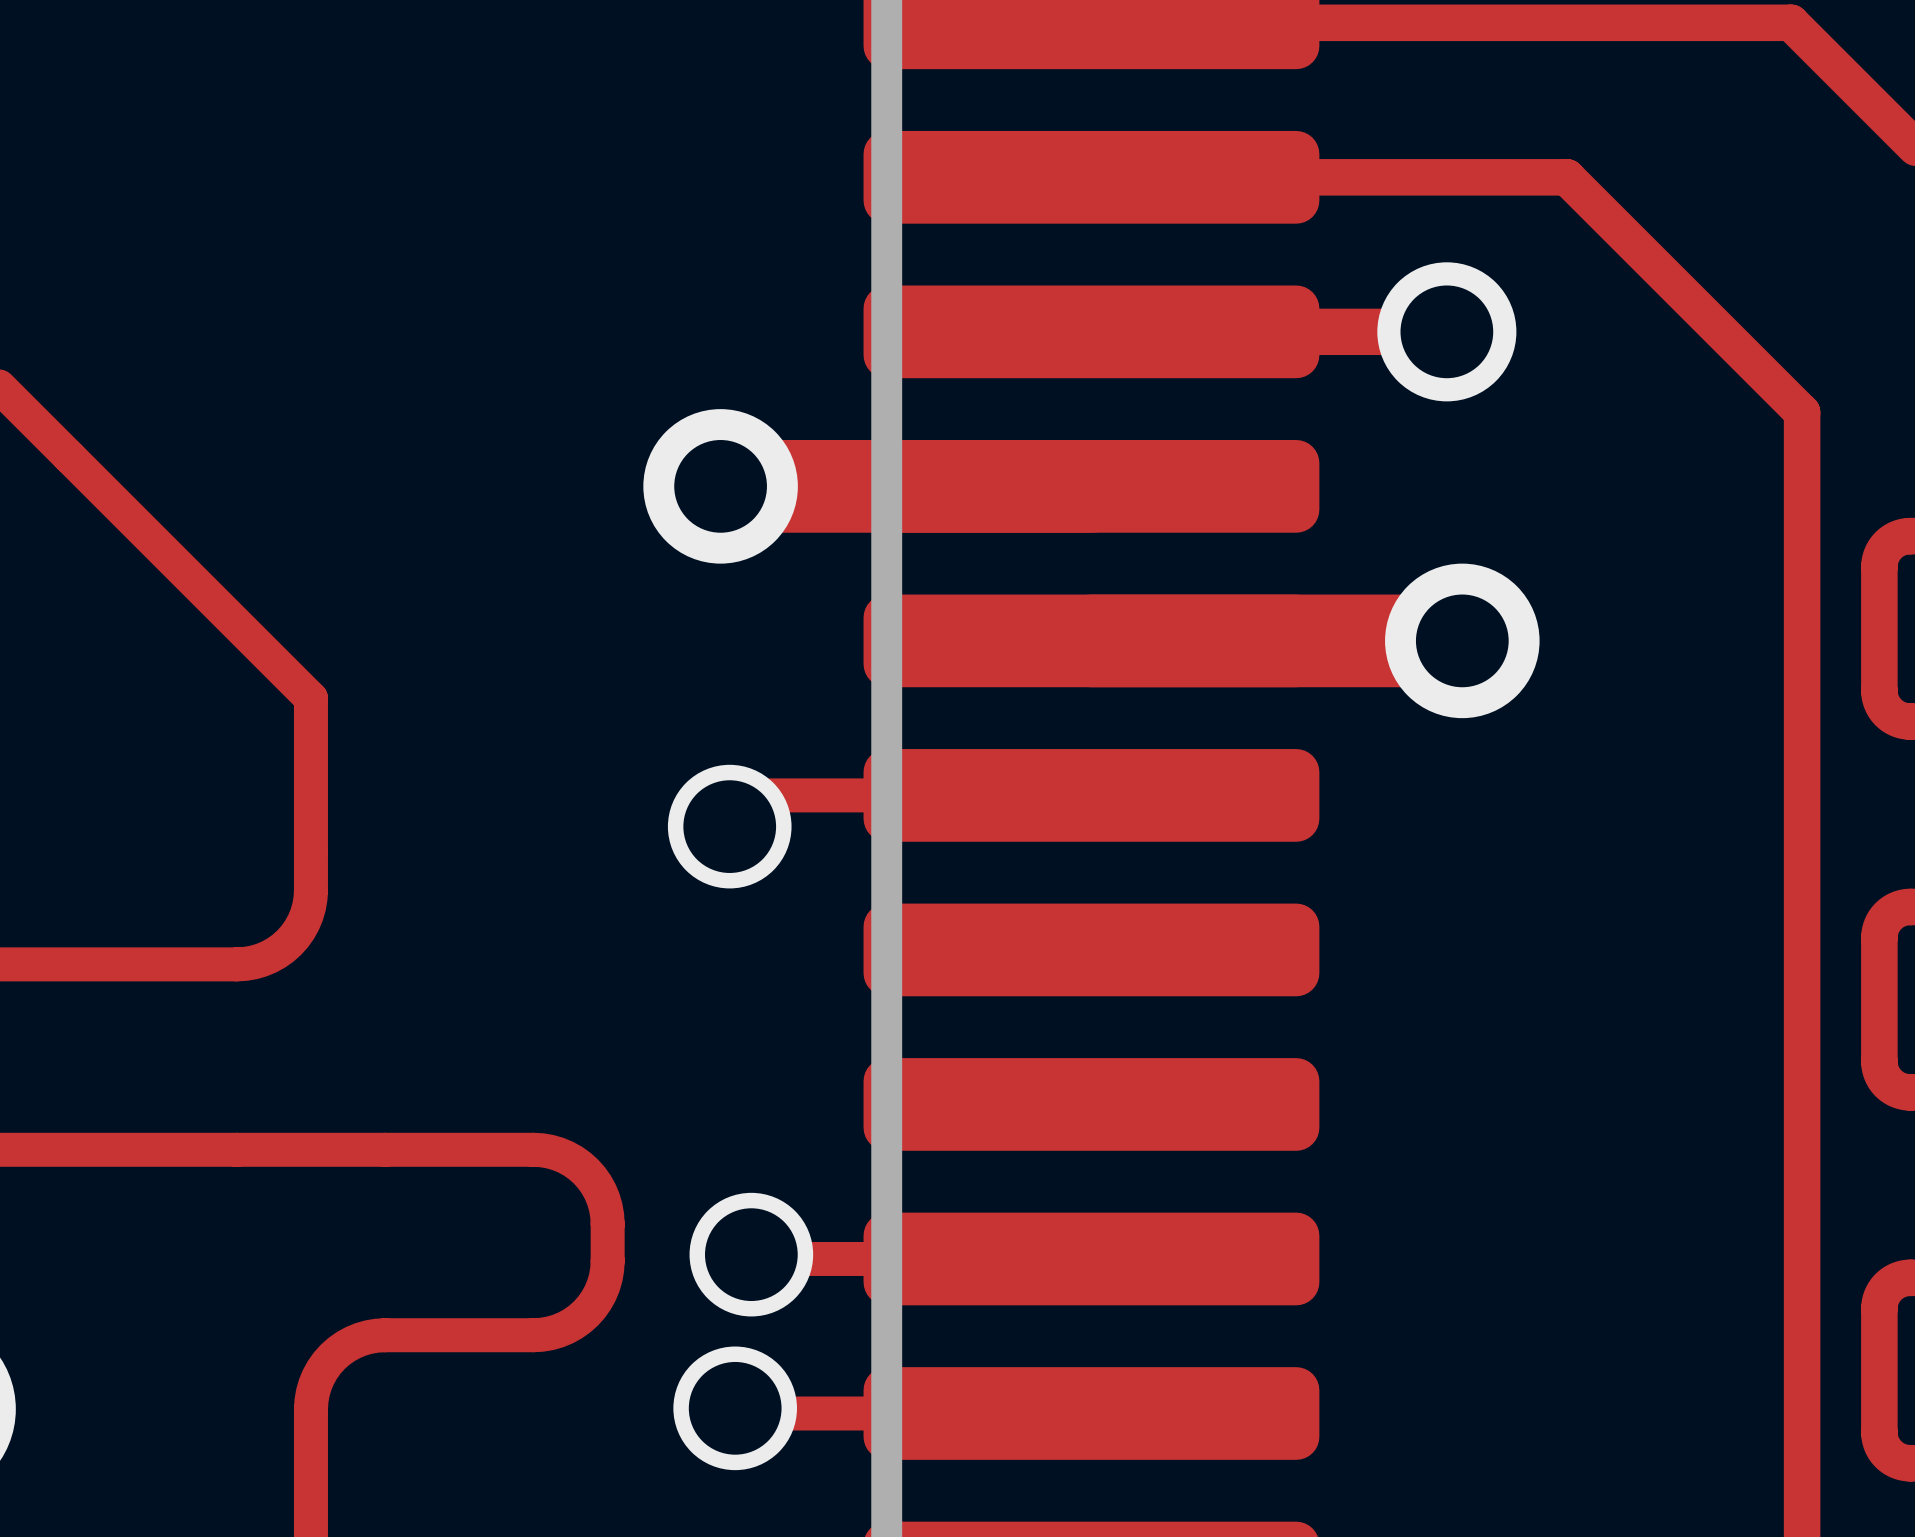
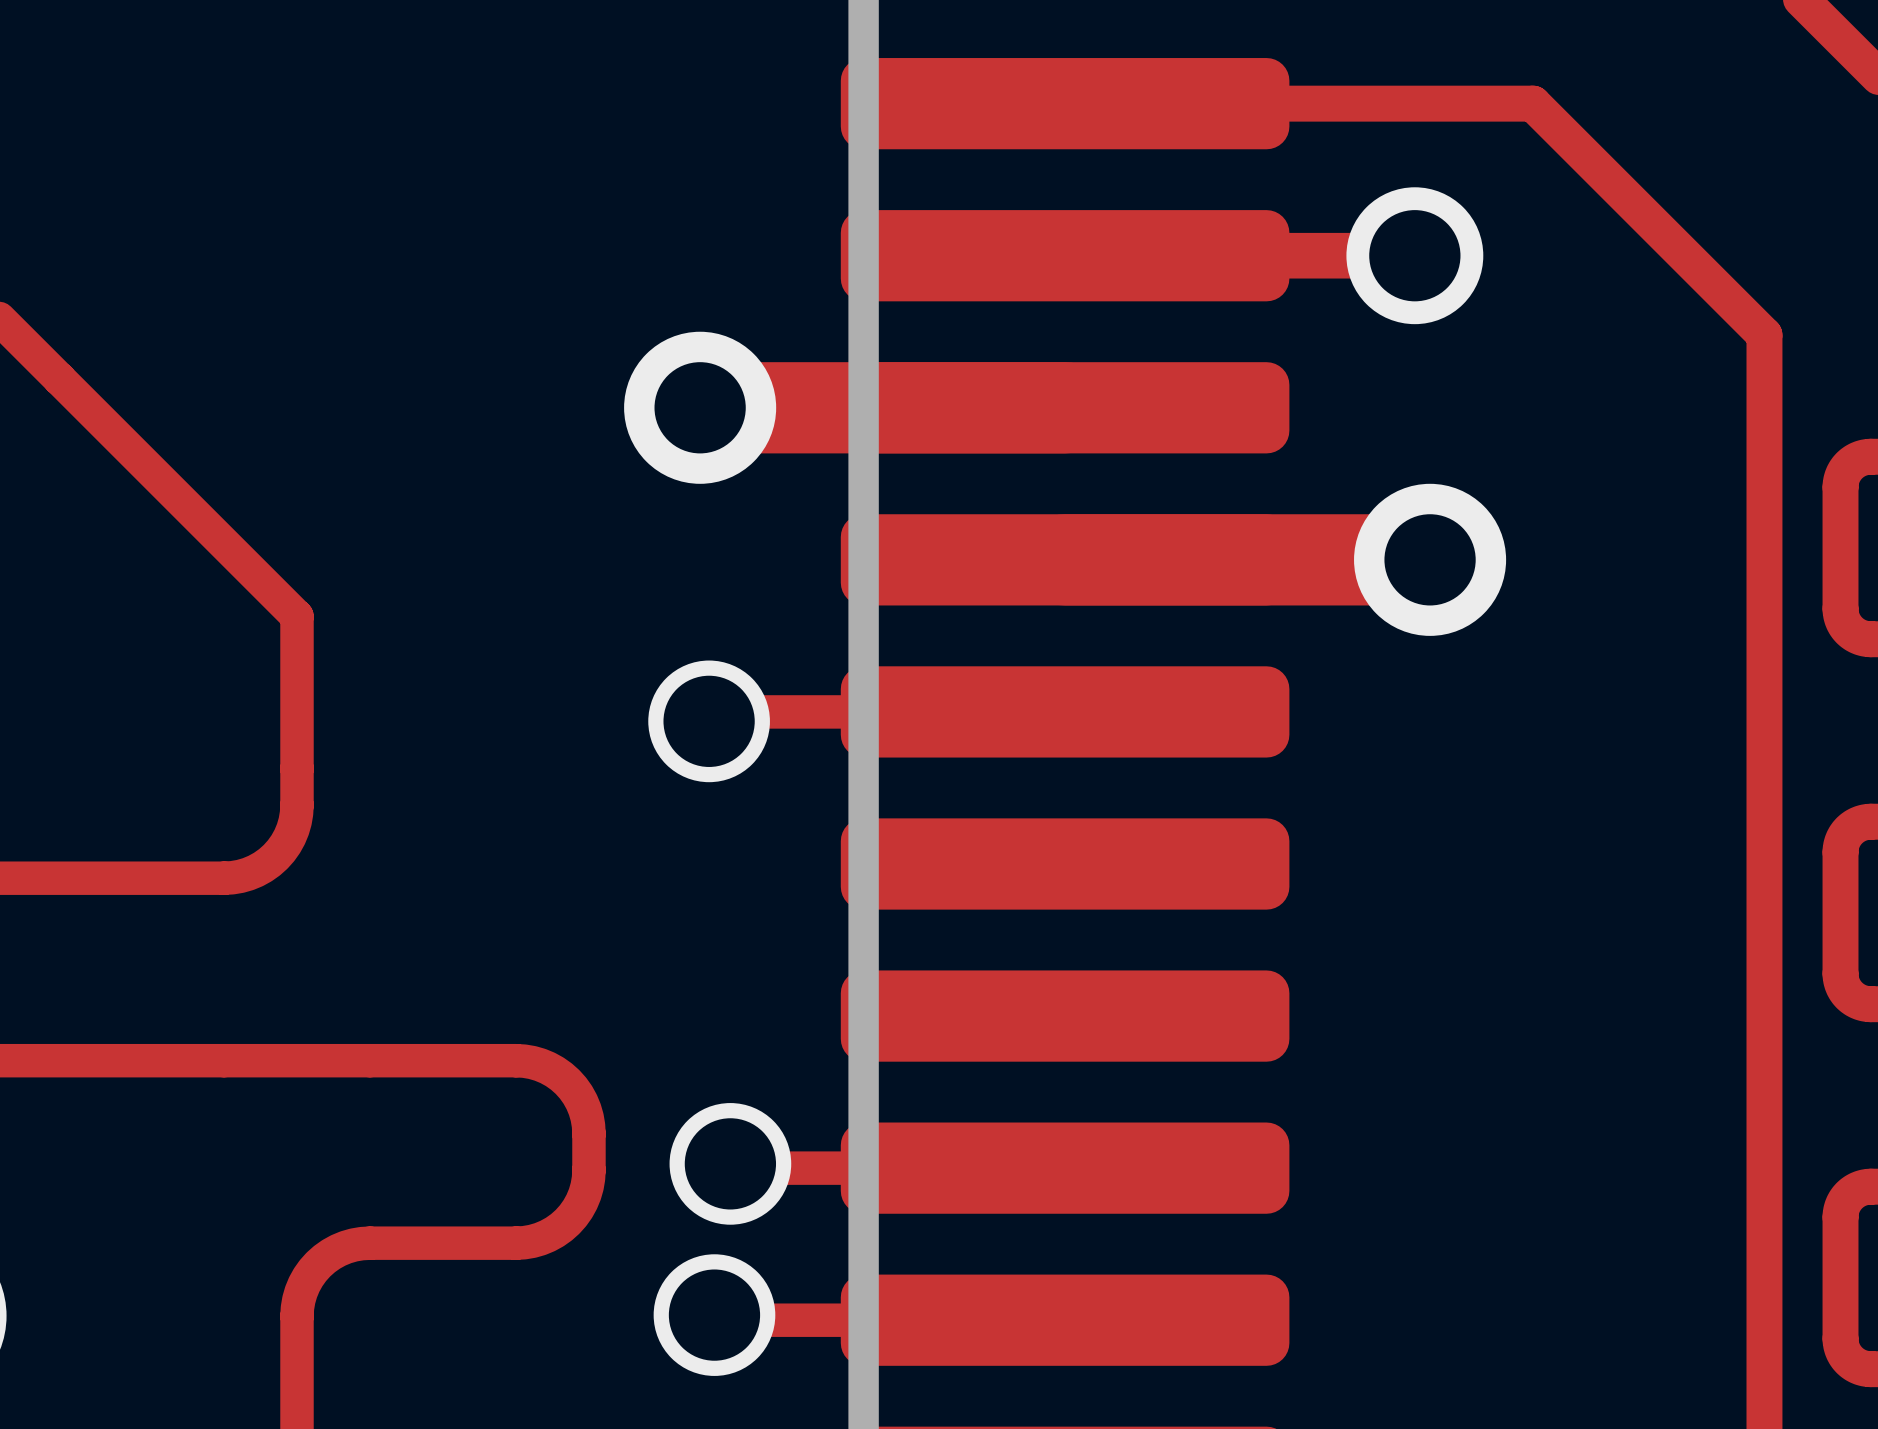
via position: (729, 826) -> (709, 721)

